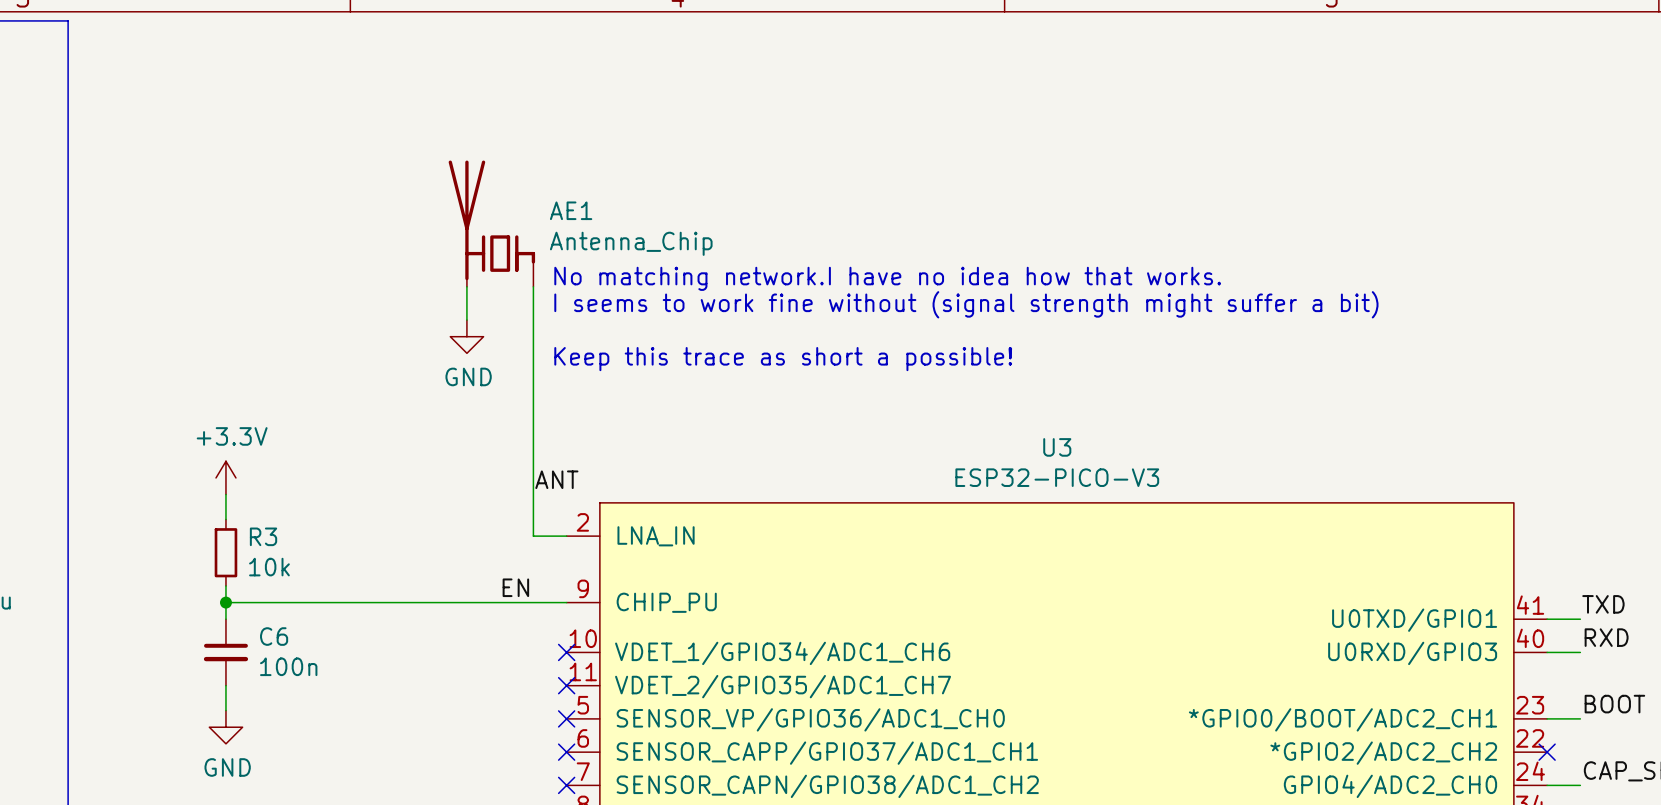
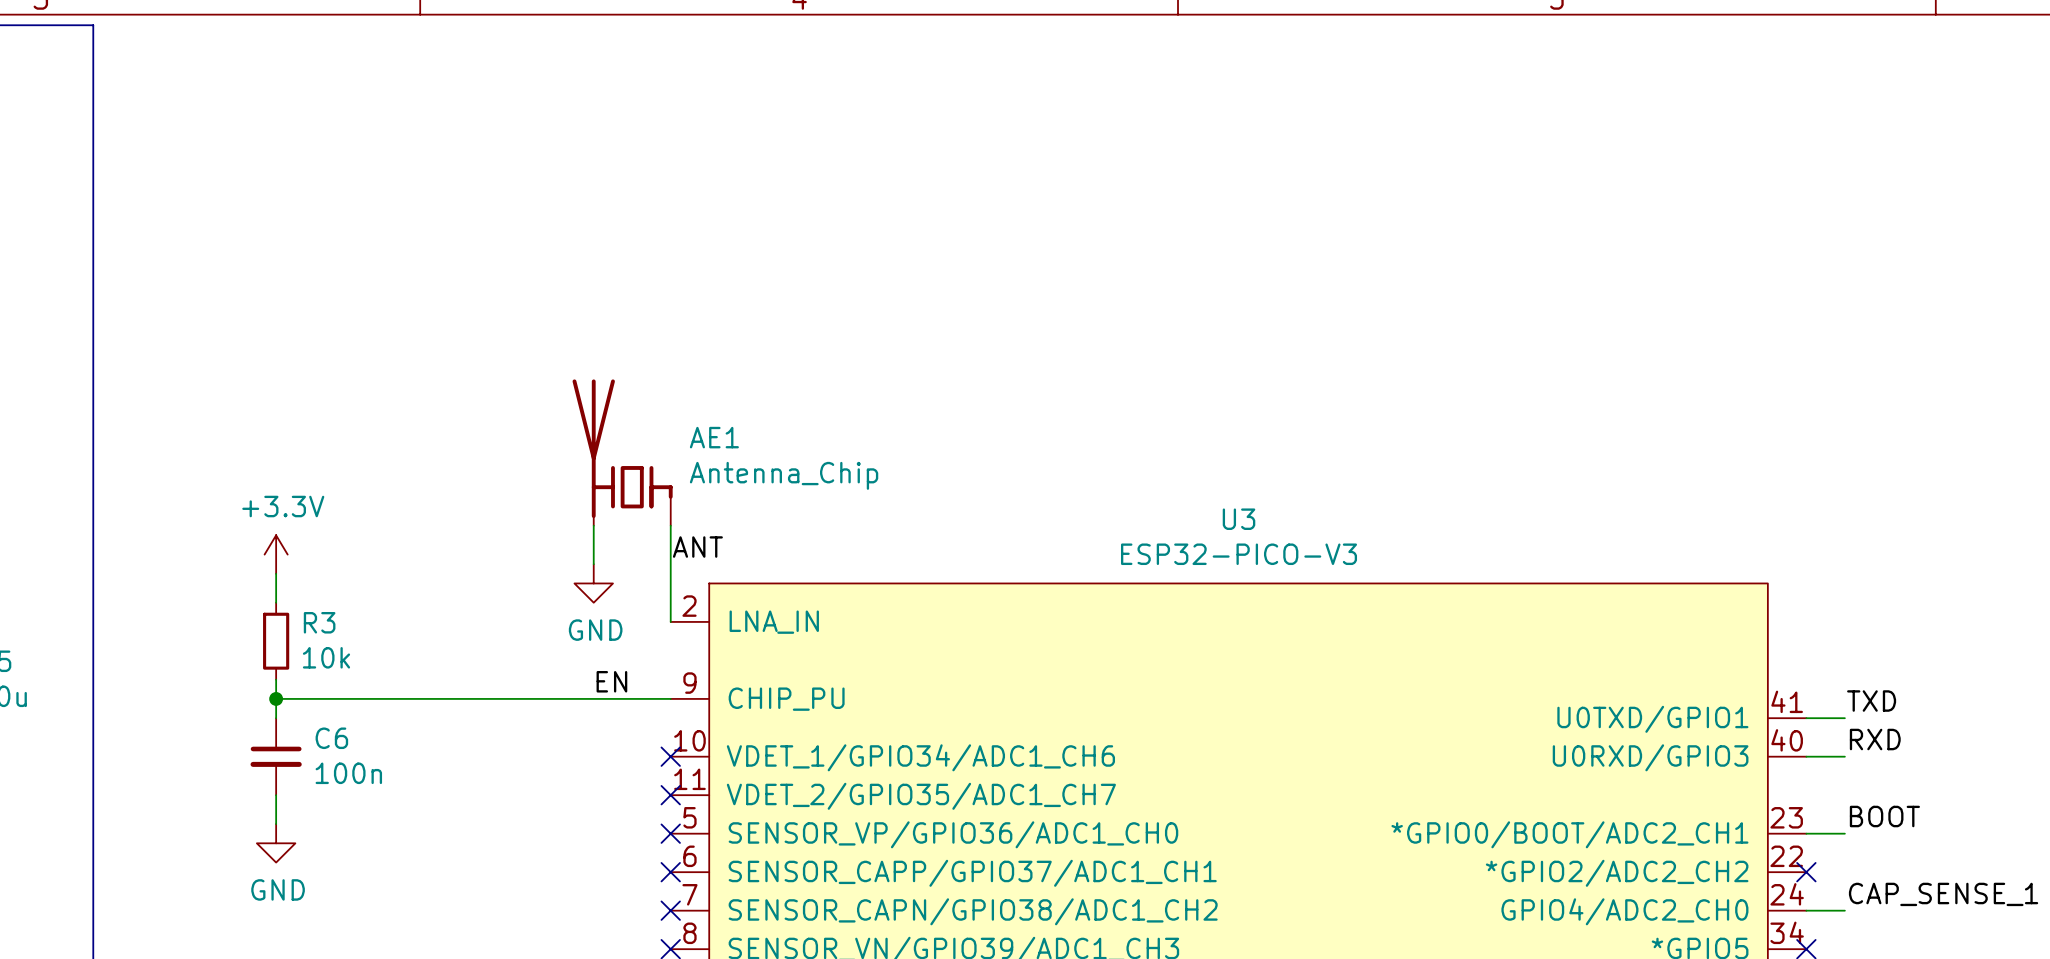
AE1 position: (491, 223) -> (622, 452)
text: No matching network.I have no idea how that works. (887, 278) -> none
wire: (466, 286) (466, 320) -> (593, 525) (593, 564)
wire: (533, 286) (533, 536) (566, 536) -> (670, 525) (670, 621)
text: I seems to work fine without (signal strength might suffer a bit) (966, 304) -> none
power symbol position: GND (466, 336) -> GND (593, 583)
text: Keep this trace as short a possible! (783, 359) -> none
label position: ANT (556, 479) -> ANT (697, 547)

